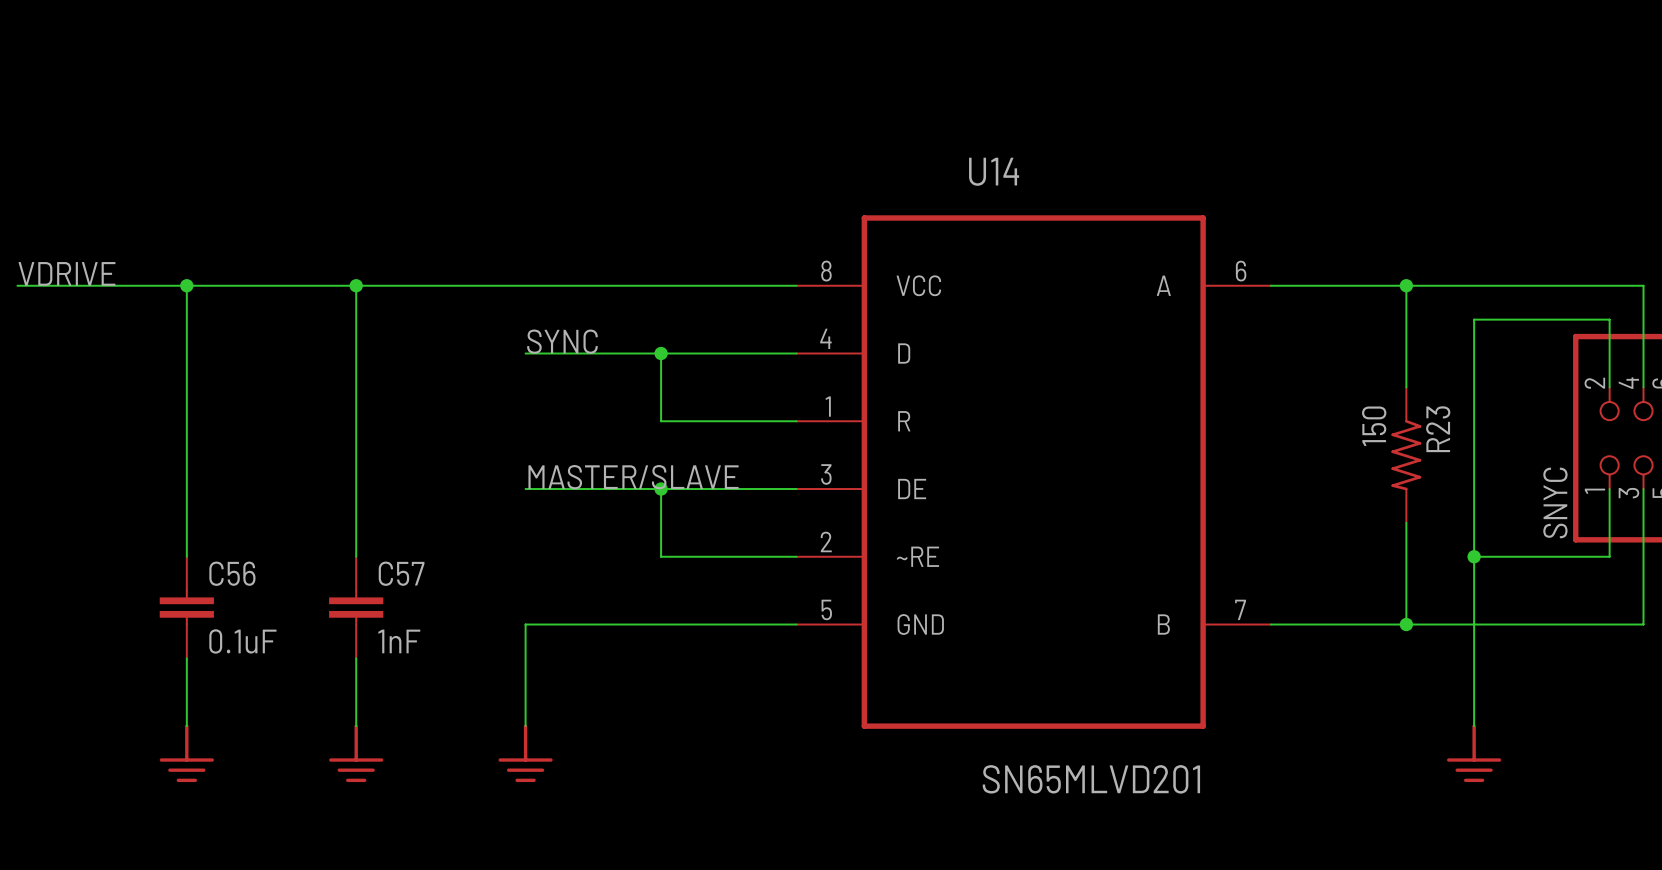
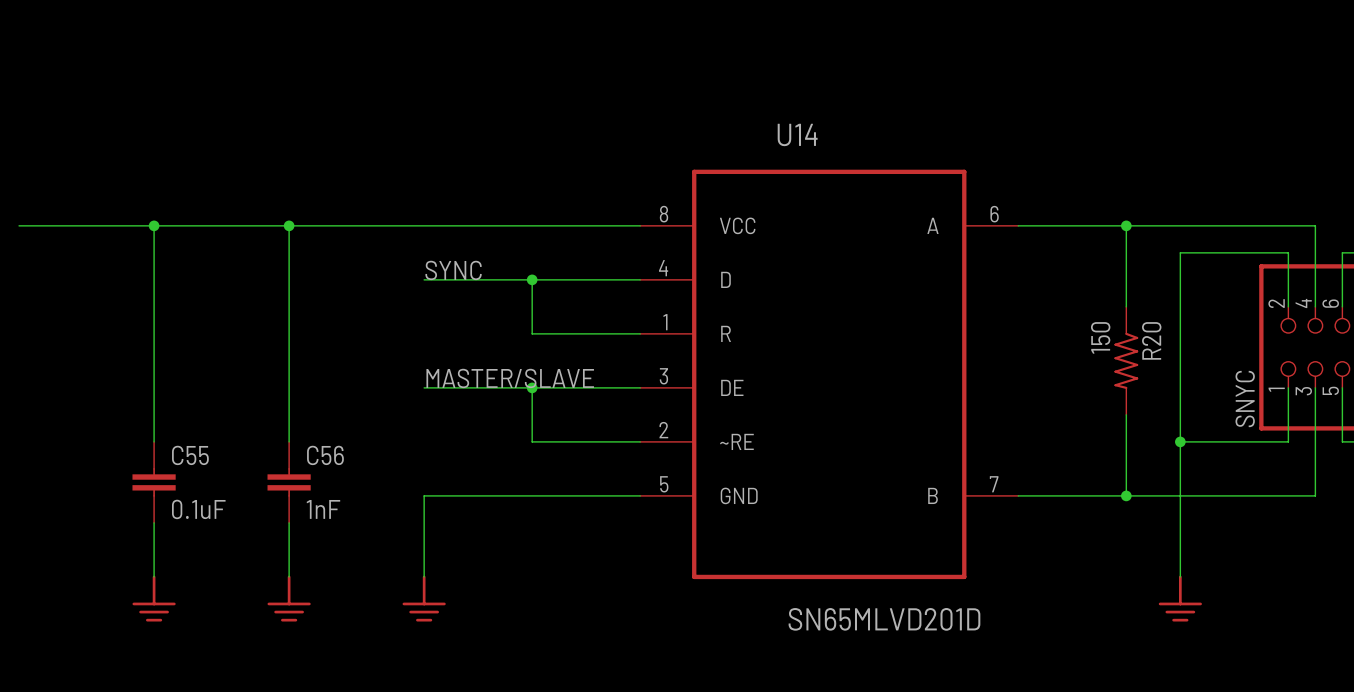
label: VDRIVE (66, 273) -> none
R23 name: R23 (1438, 429) -> R20 (1151, 340)
C56 name: C56 (232, 573) -> C55 (190, 455)
C57 name: C57 (401, 573) -> C56 (325, 455)
U14 value: SN65MLVD201 (1091, 779) -> SN65MLVD201D (884, 619)

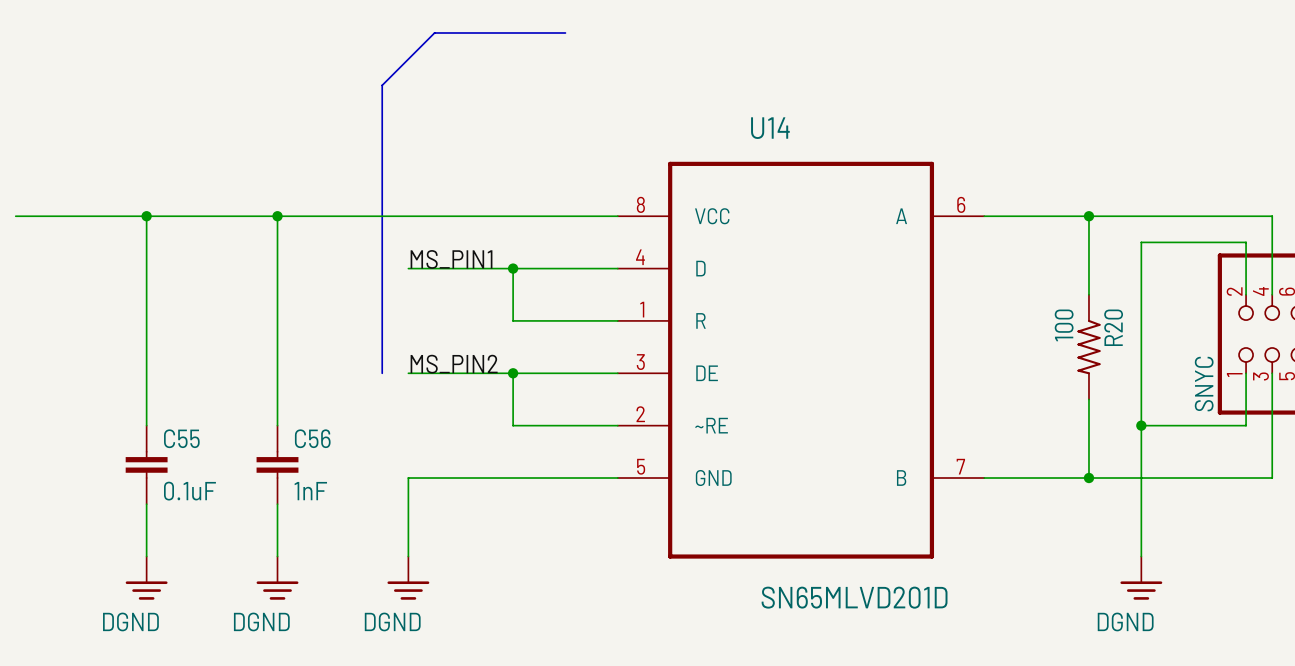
bus: none -> (565, 32) (434, 32) (382, 85) (382, 373)
label: SYNC (453, 270) -> MS_PIN1 (451, 259)
R20 value: 150 (1100, 337) -> 100 (1064, 325)
label: MASTER/SLAVE (510, 378) -> MS_PIN2 (454, 364)
part: (154, 598) -> none
part: (289, 598) -> none
part: (424, 598) -> none
part: (1180, 598) -> none
power symbol: none -> DGND (146, 578)
power symbol: none -> DGND (277, 578)
power symbol: none -> DGND (408, 578)
power symbol: none -> DGND (1141, 578)

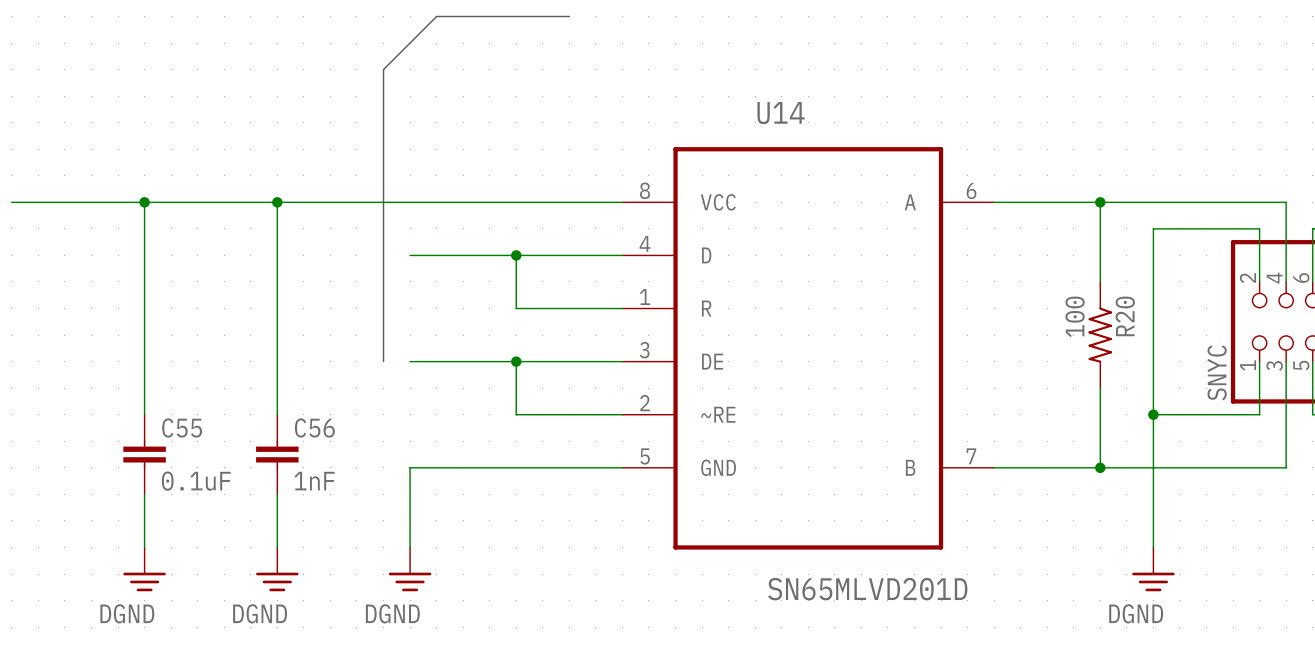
label: MS_PIN1 (451, 259) -> none
label: MS_PIN2 (454, 364) -> none

